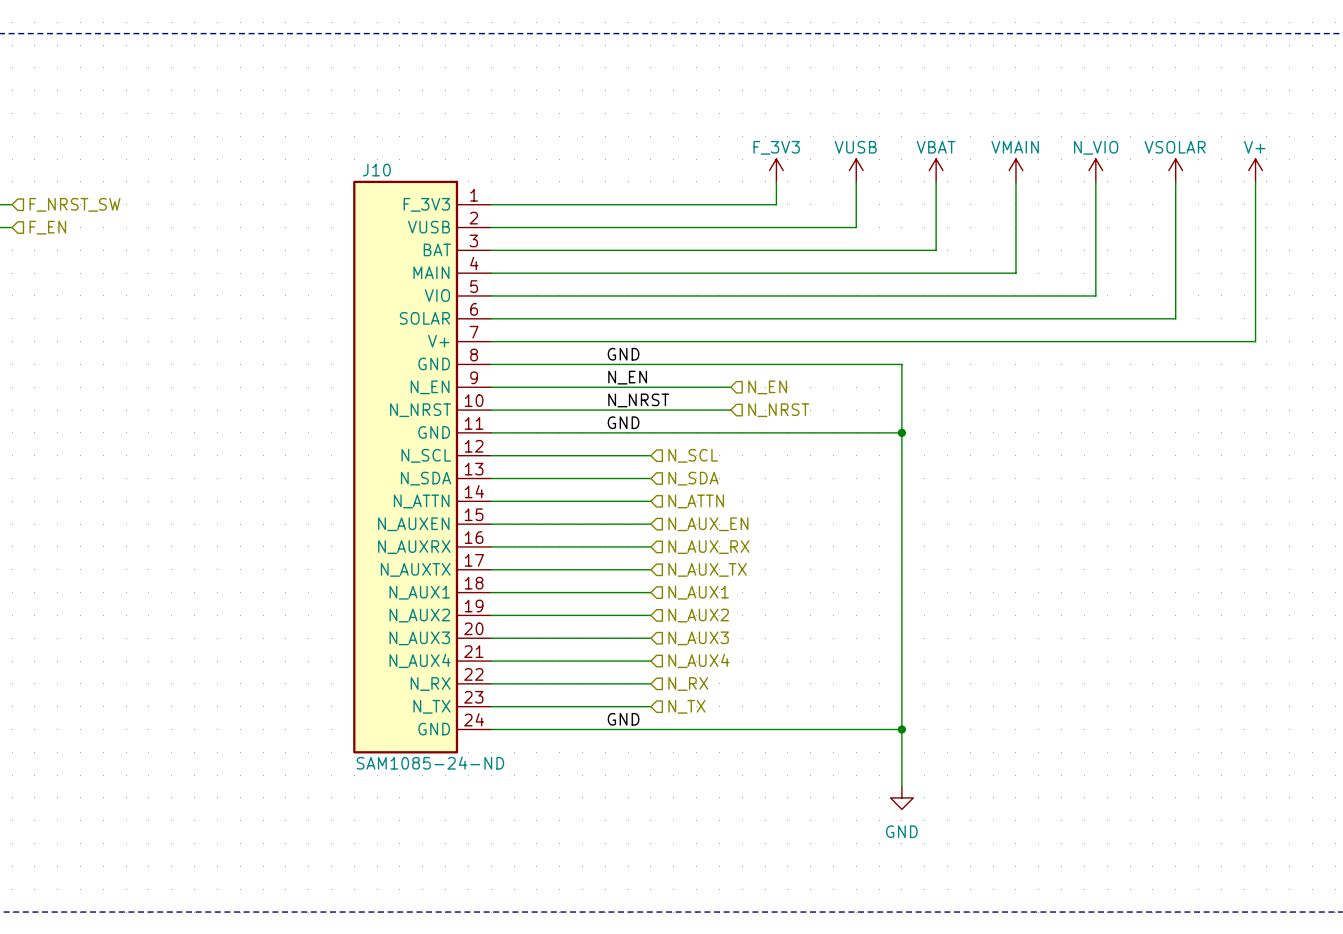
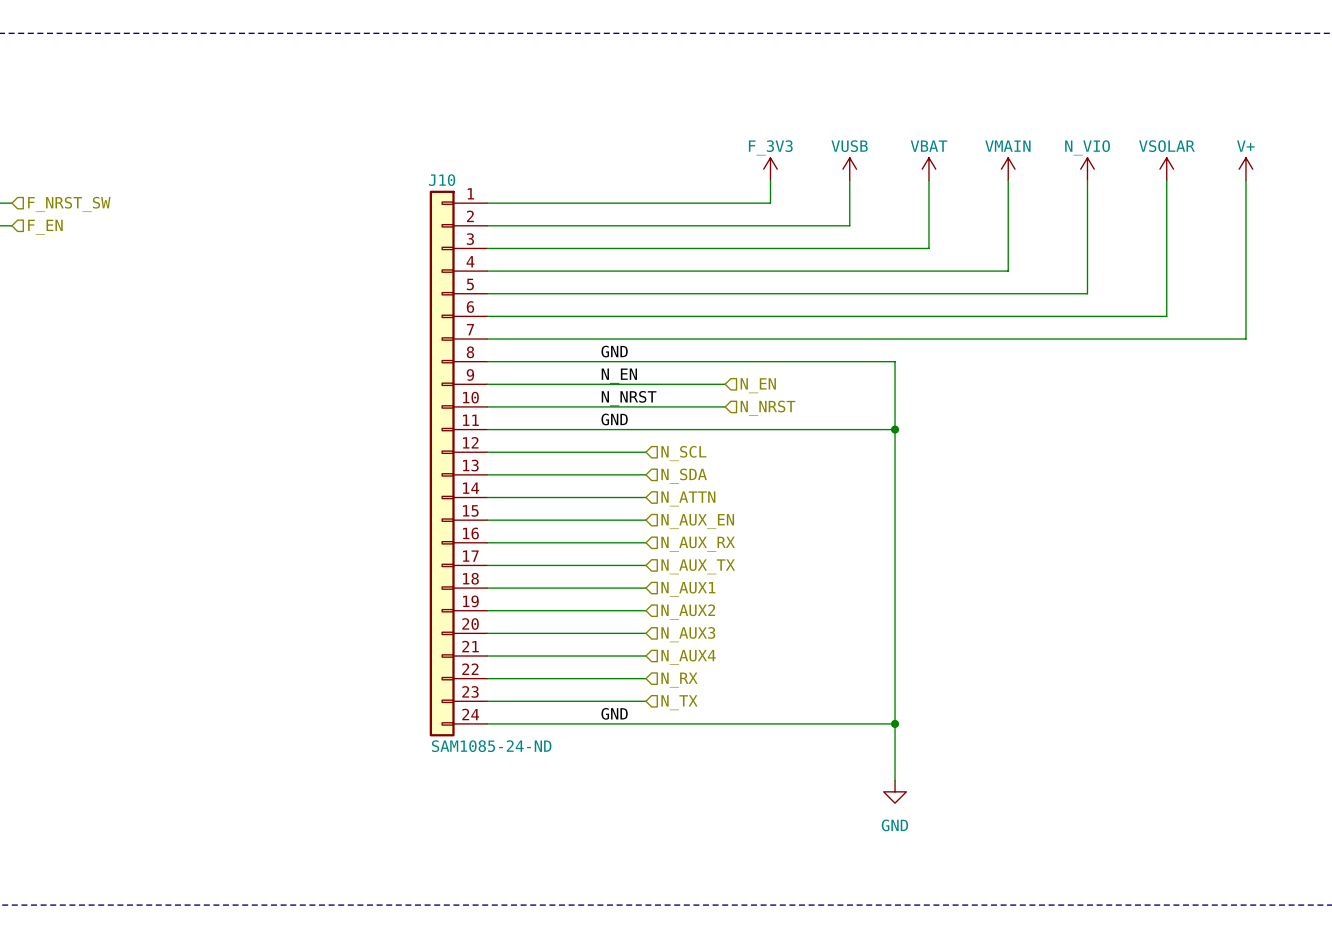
J10 name position: J10 (376, 170) -> J10 (442, 180)
J10 symbol: [353, 180, 492, 754] -> [429, 190, 488, 737]
J10 text position: SAM1085-24-ND (430, 763) -> SAM1085-24-ND (491, 746)

